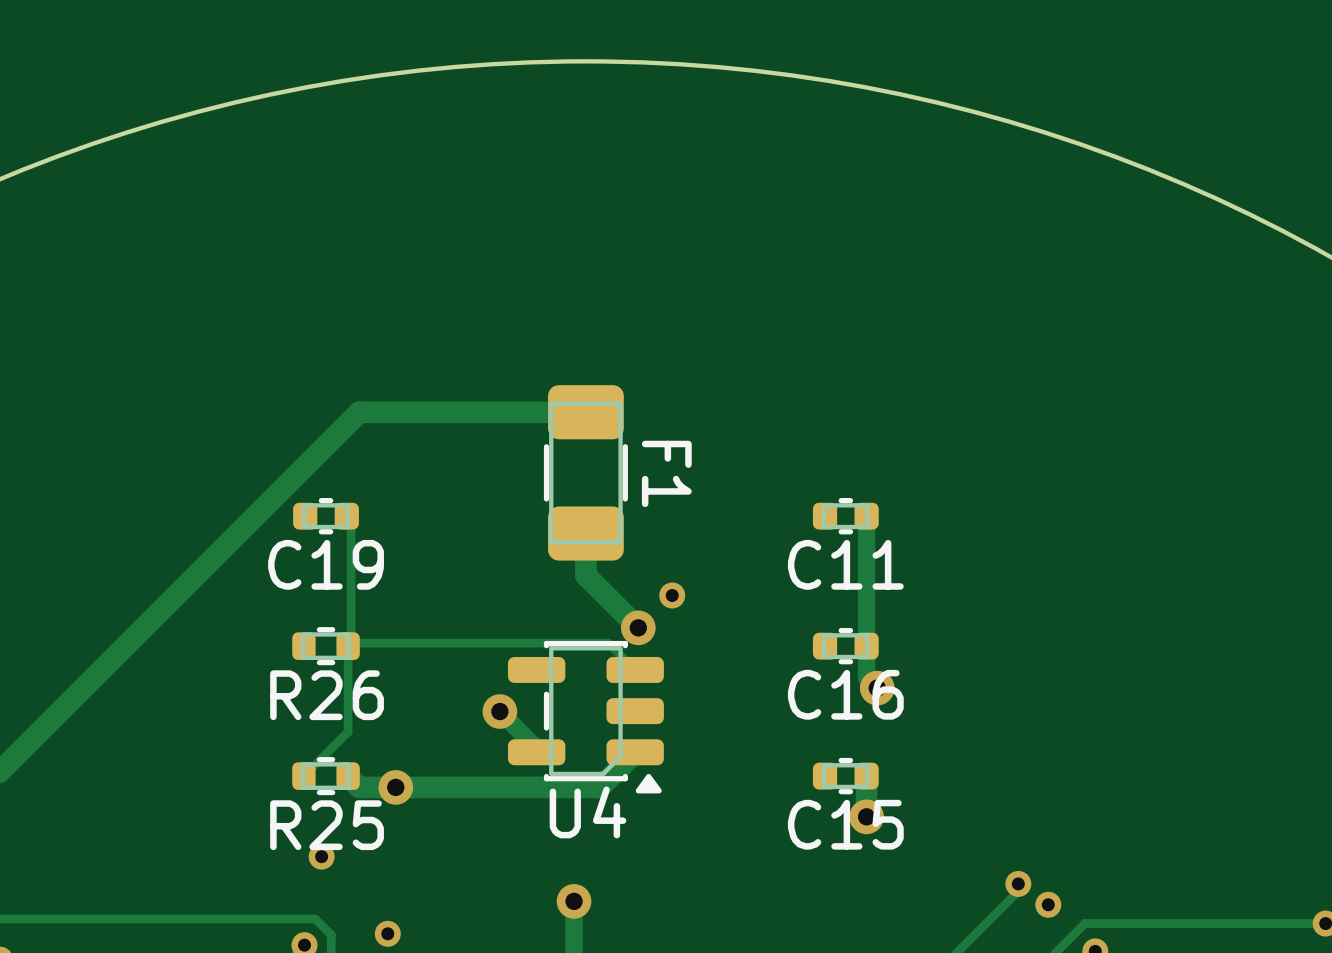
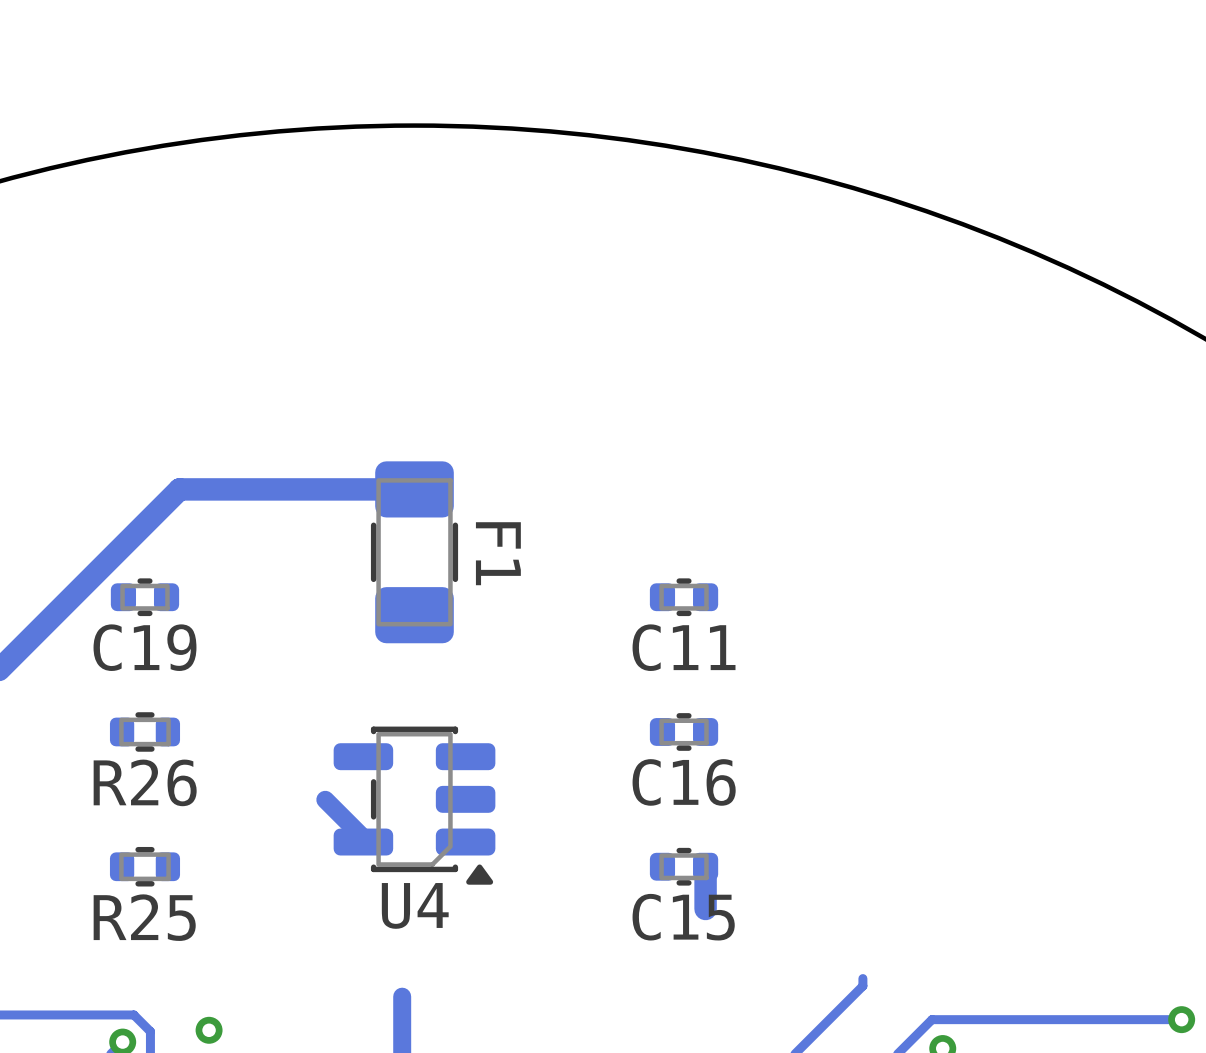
track: (346, 516) (351, 520) (351, 643) -> none
track: (866, 516) (866, 677) (877, 688) -> none
track: (585, 533) (585, 575) (638, 627) -> none
via: (672, 595) -> none
via: (638, 627) -> none
track: (351, 643) (348, 646) (348, 731) (303, 776) -> none
track: (351, 643) (608, 643) (635, 669) -> none
via: (877, 688) -> none
via: (499, 711) -> none
track: (635, 752) (600, 787) (359, 787) (348, 776) -> none
via: (395, 787) -> none
via: (866, 816) -> none
via: (321, 856) -> none
via: (1018, 883) -> none
via: (574, 901) -> none
via: (1048, 904) -> none

